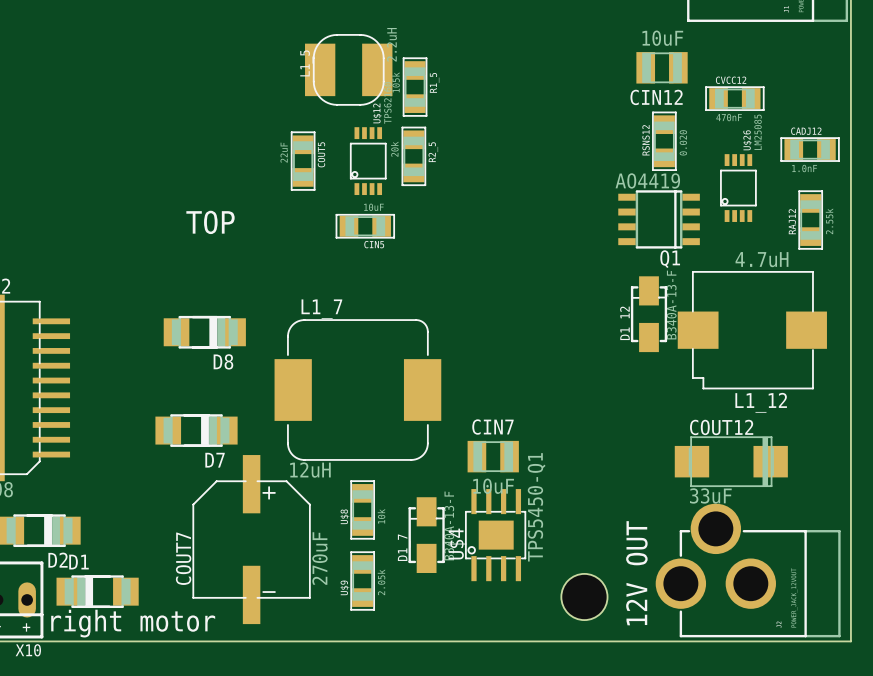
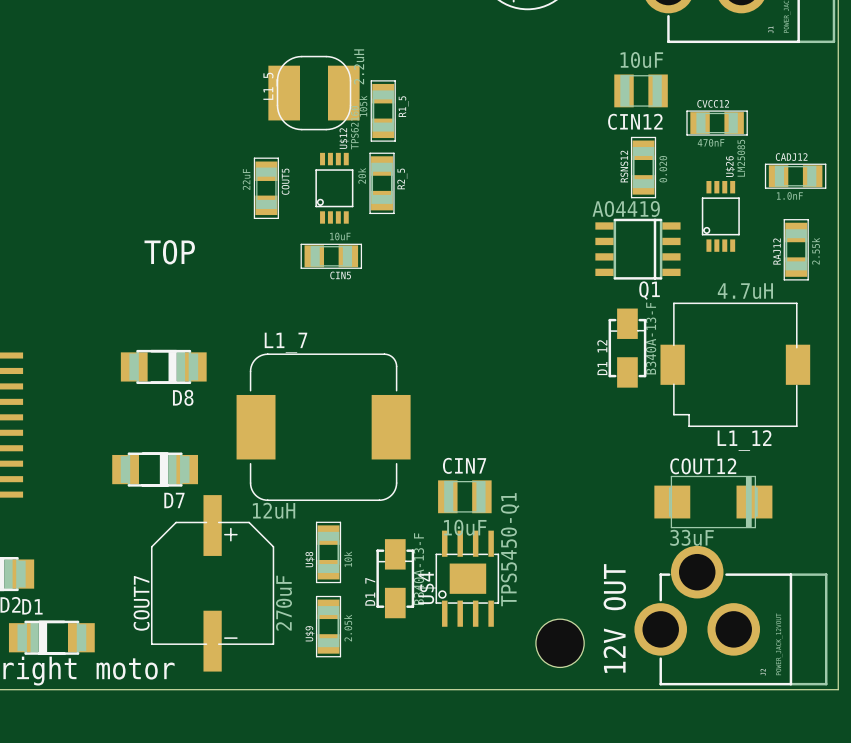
L1_12 footprint: [677, 271, 827, 390] -> [660, 302, 811, 428]

